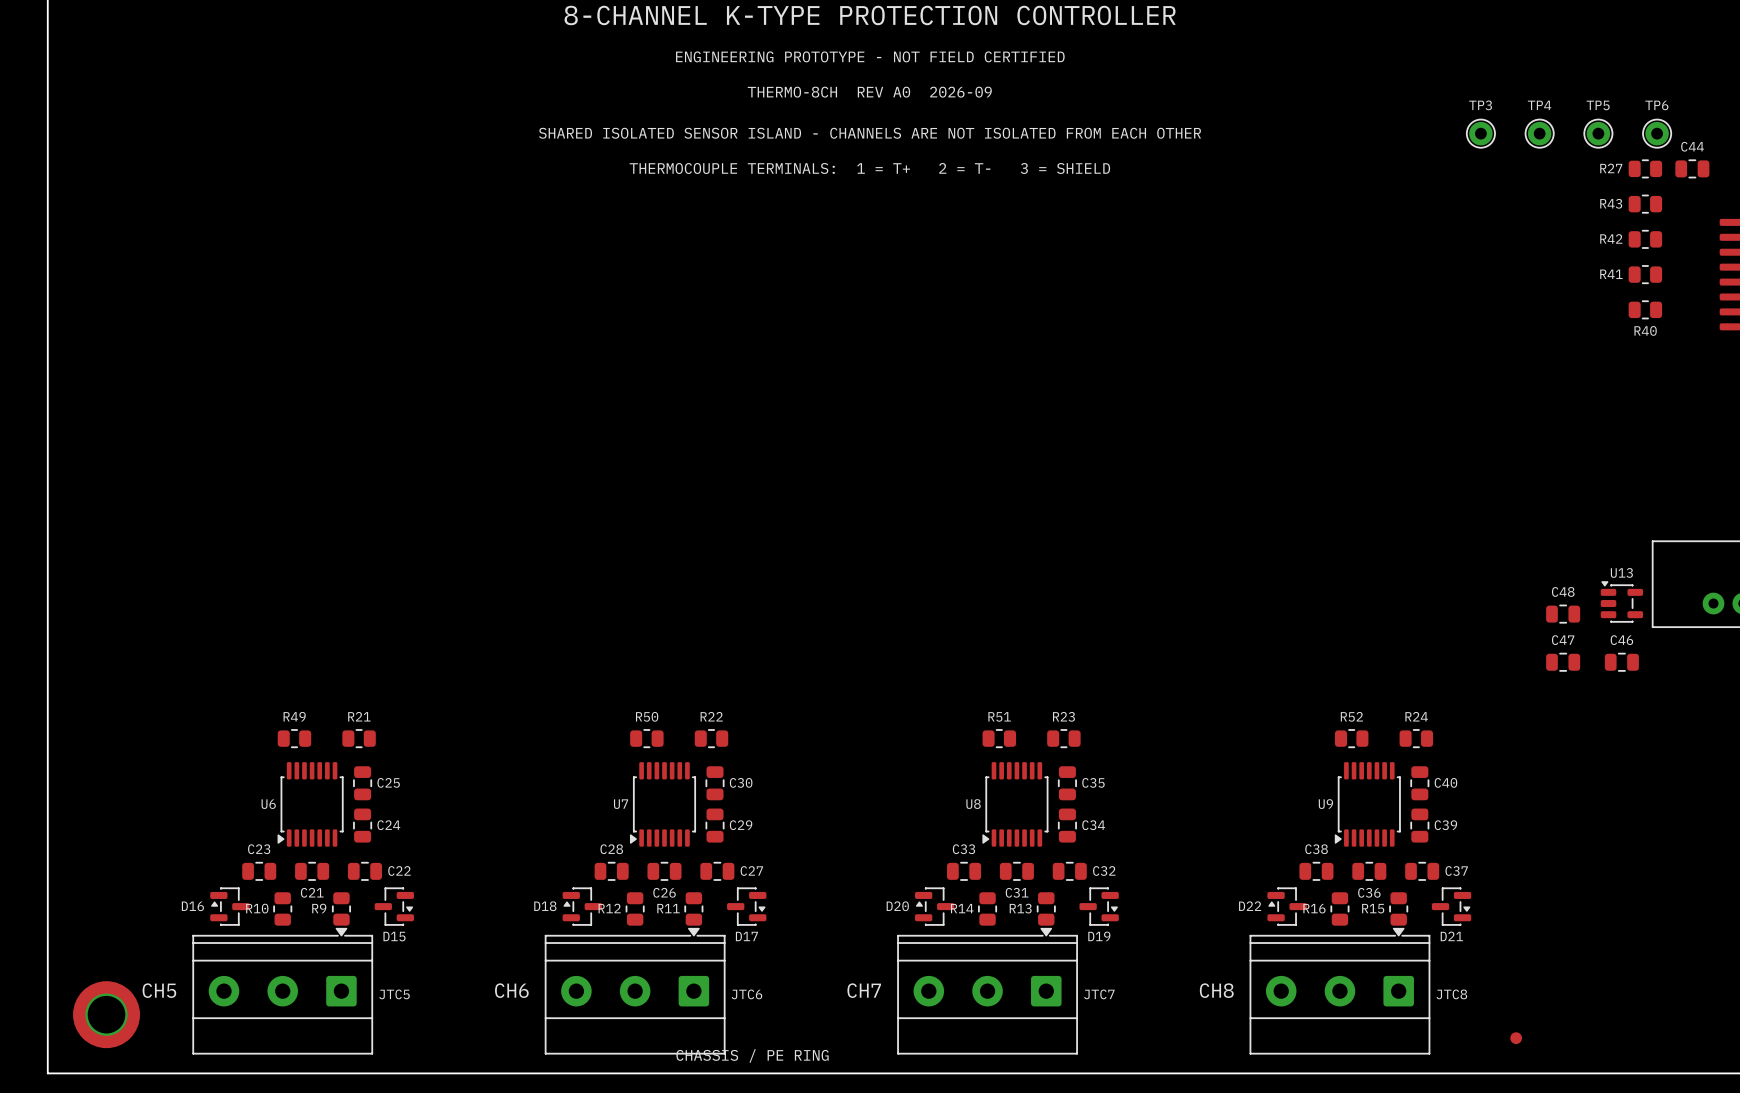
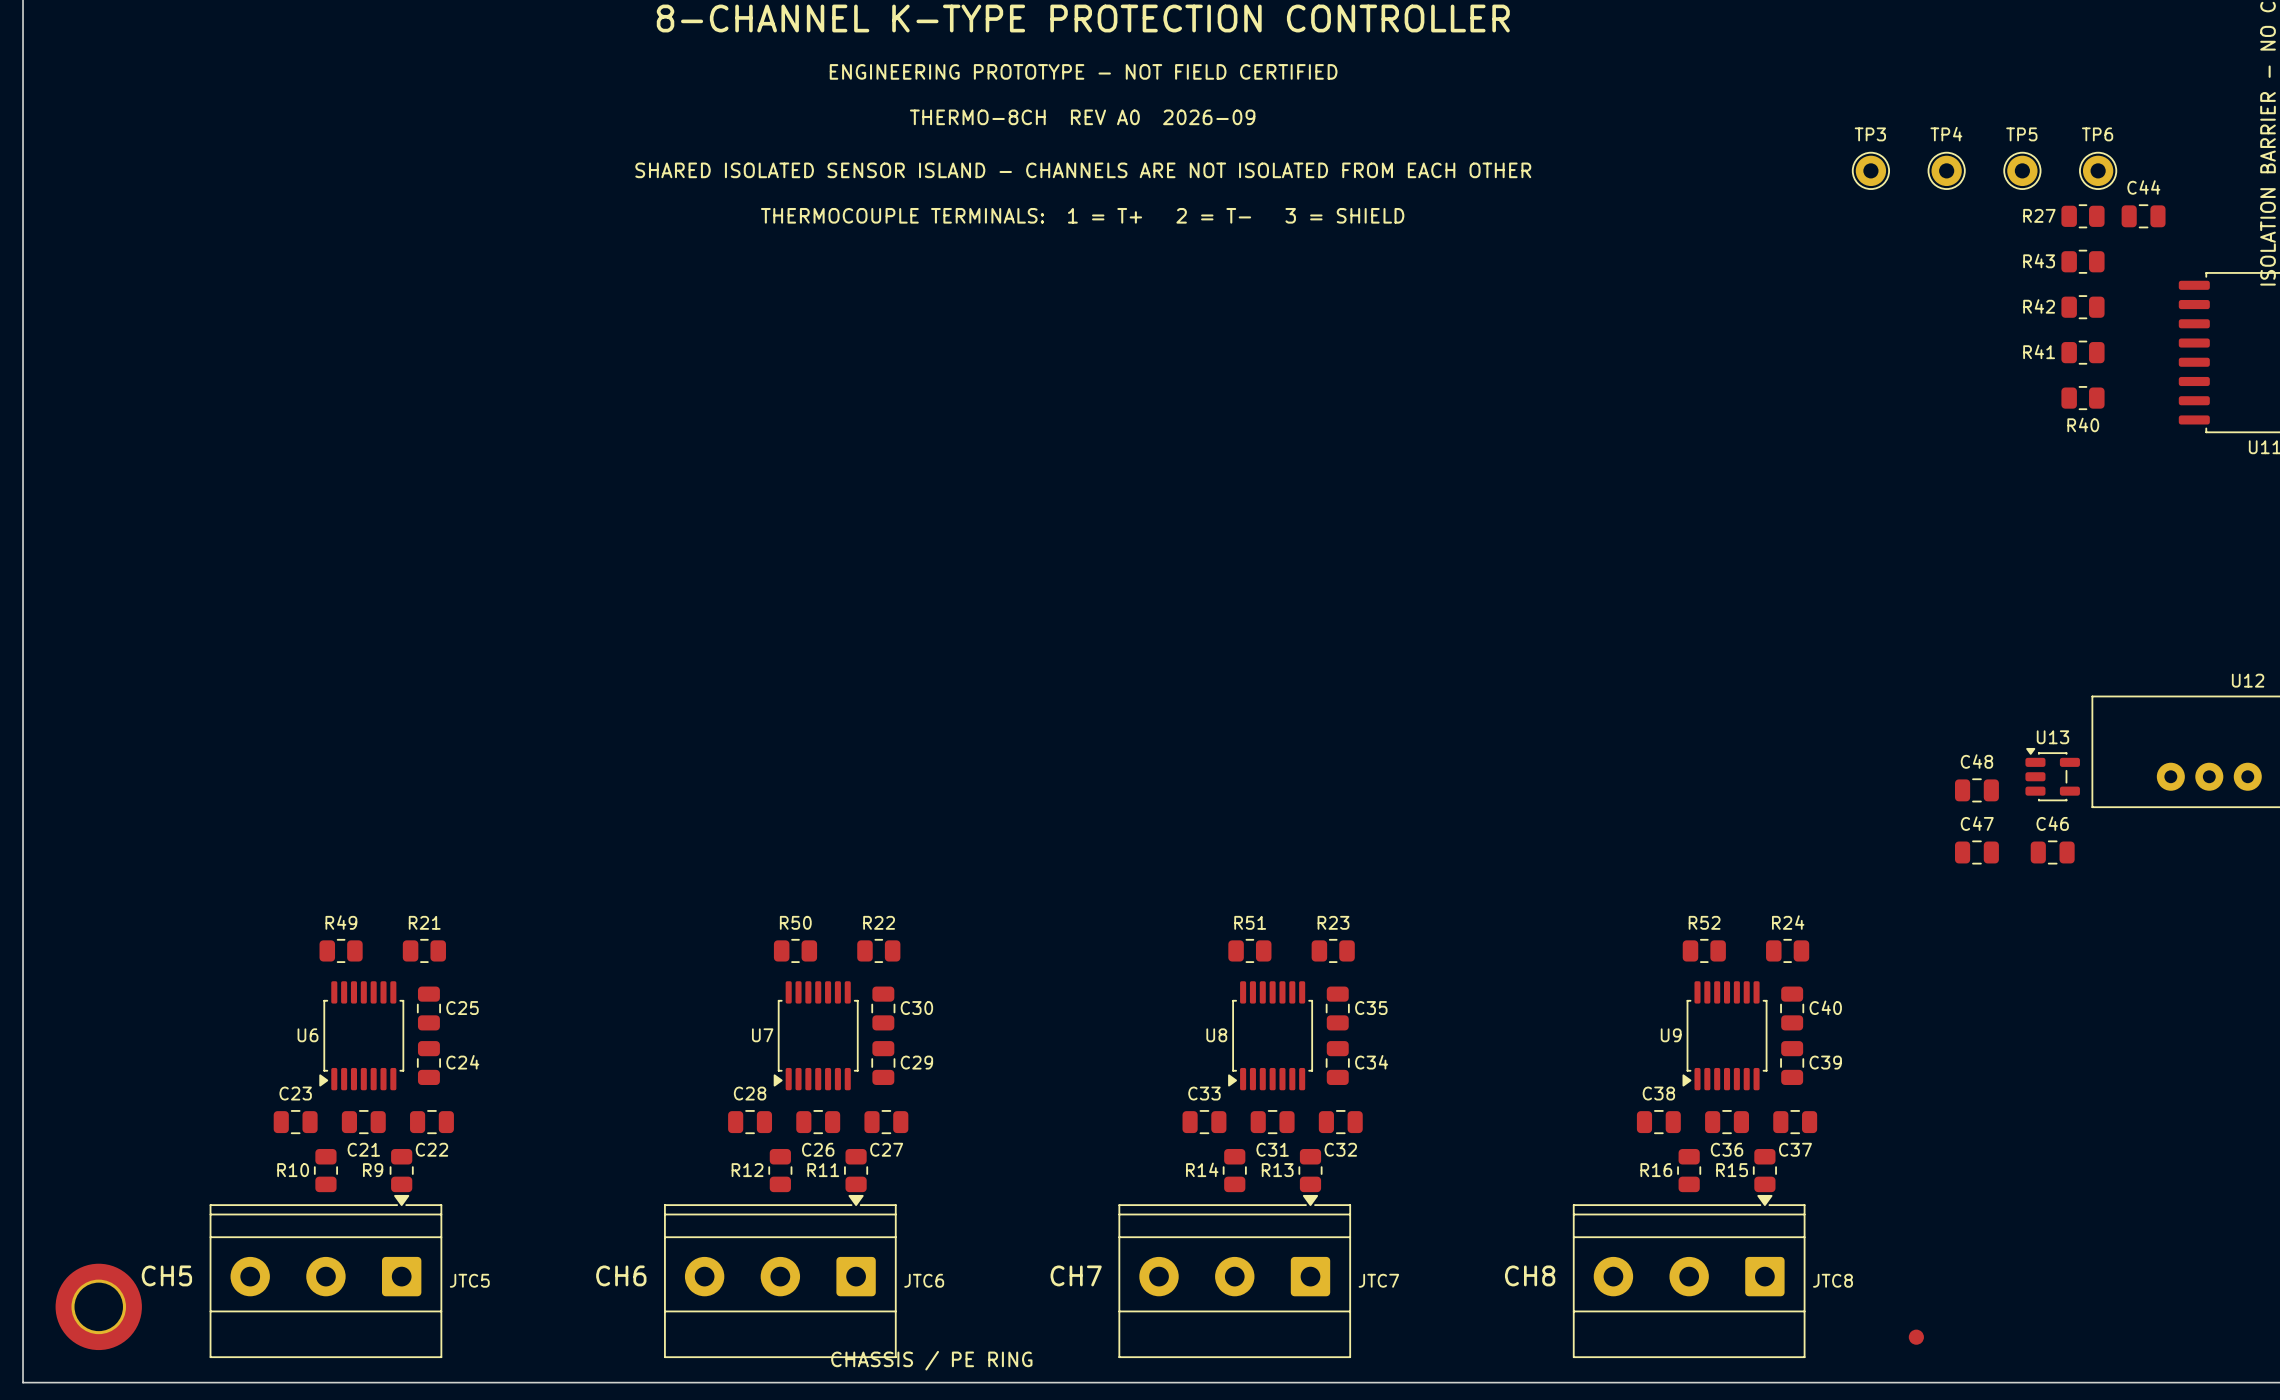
C22 name position: C22 (399, 871) -> C22 (431, 1149)
C27 name position: C27 (751, 871) -> C27 (886, 1149)
C32 name position: C32 (1104, 871) -> C32 (1340, 1149)
C37 name position: C37 (1456, 871) -> C37 (1795, 1149)
D16: (229, 906) -> none
D15: (394, 906) -> none
D18: (582, 906) -> none
D17: (746, 906) -> none
D20: (934, 906) -> none
D19: (1099, 906) -> none
D22: (1287, 906) -> none
D21: (1451, 906) -> none

